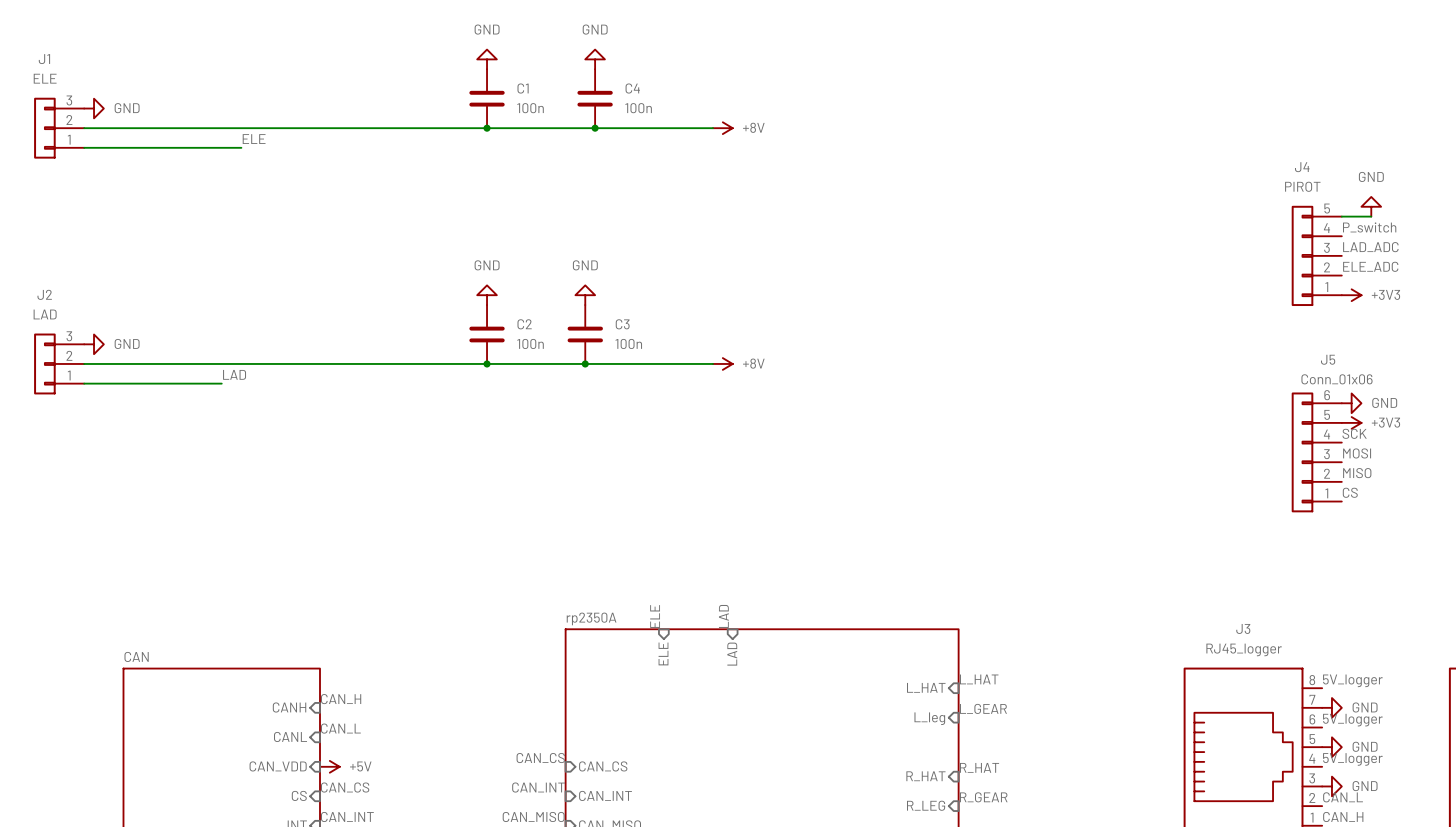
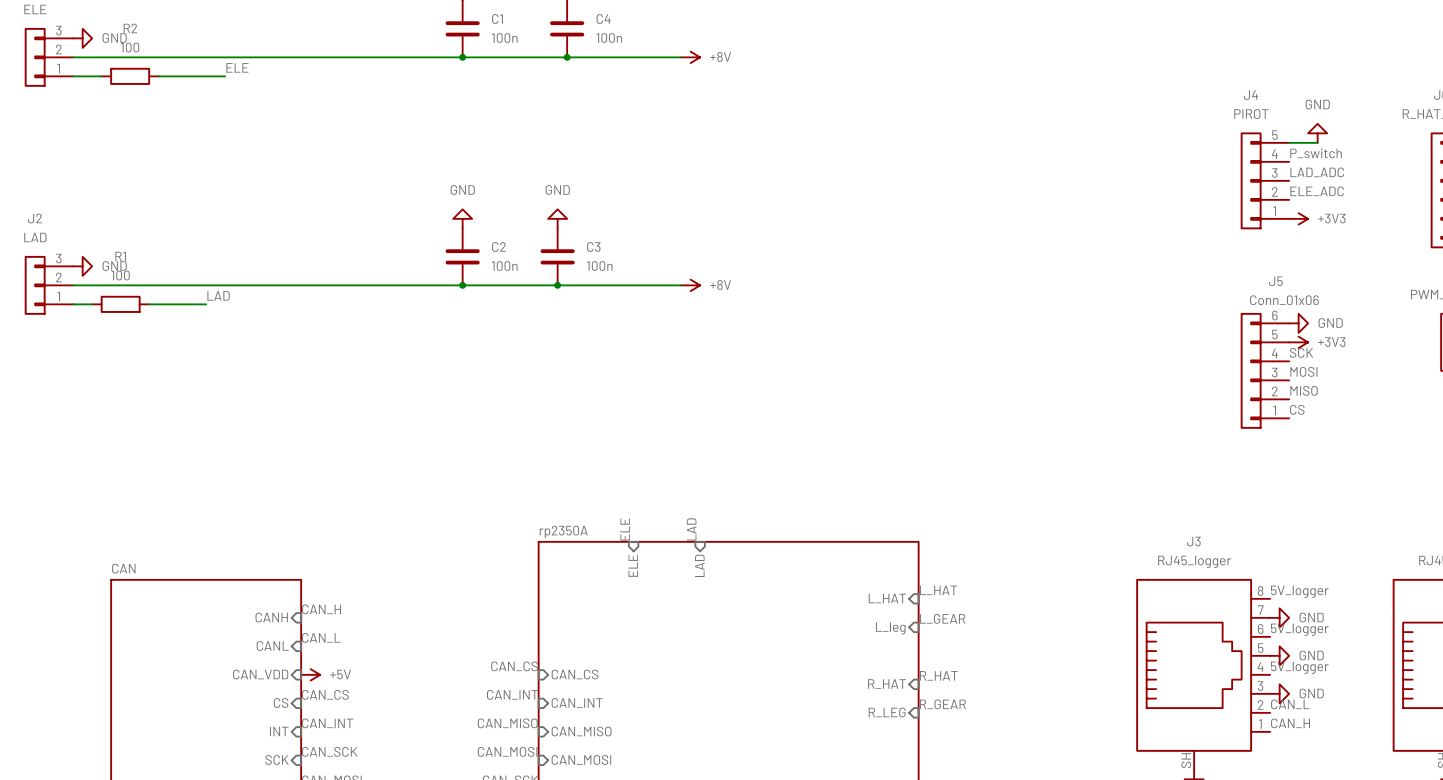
wire: (113, 147) (172, 147) -> none
R2: none -> 100 (130, 76)
wire: (103, 383) (162, 383) -> none
R1: none -> 100 (120, 304)

